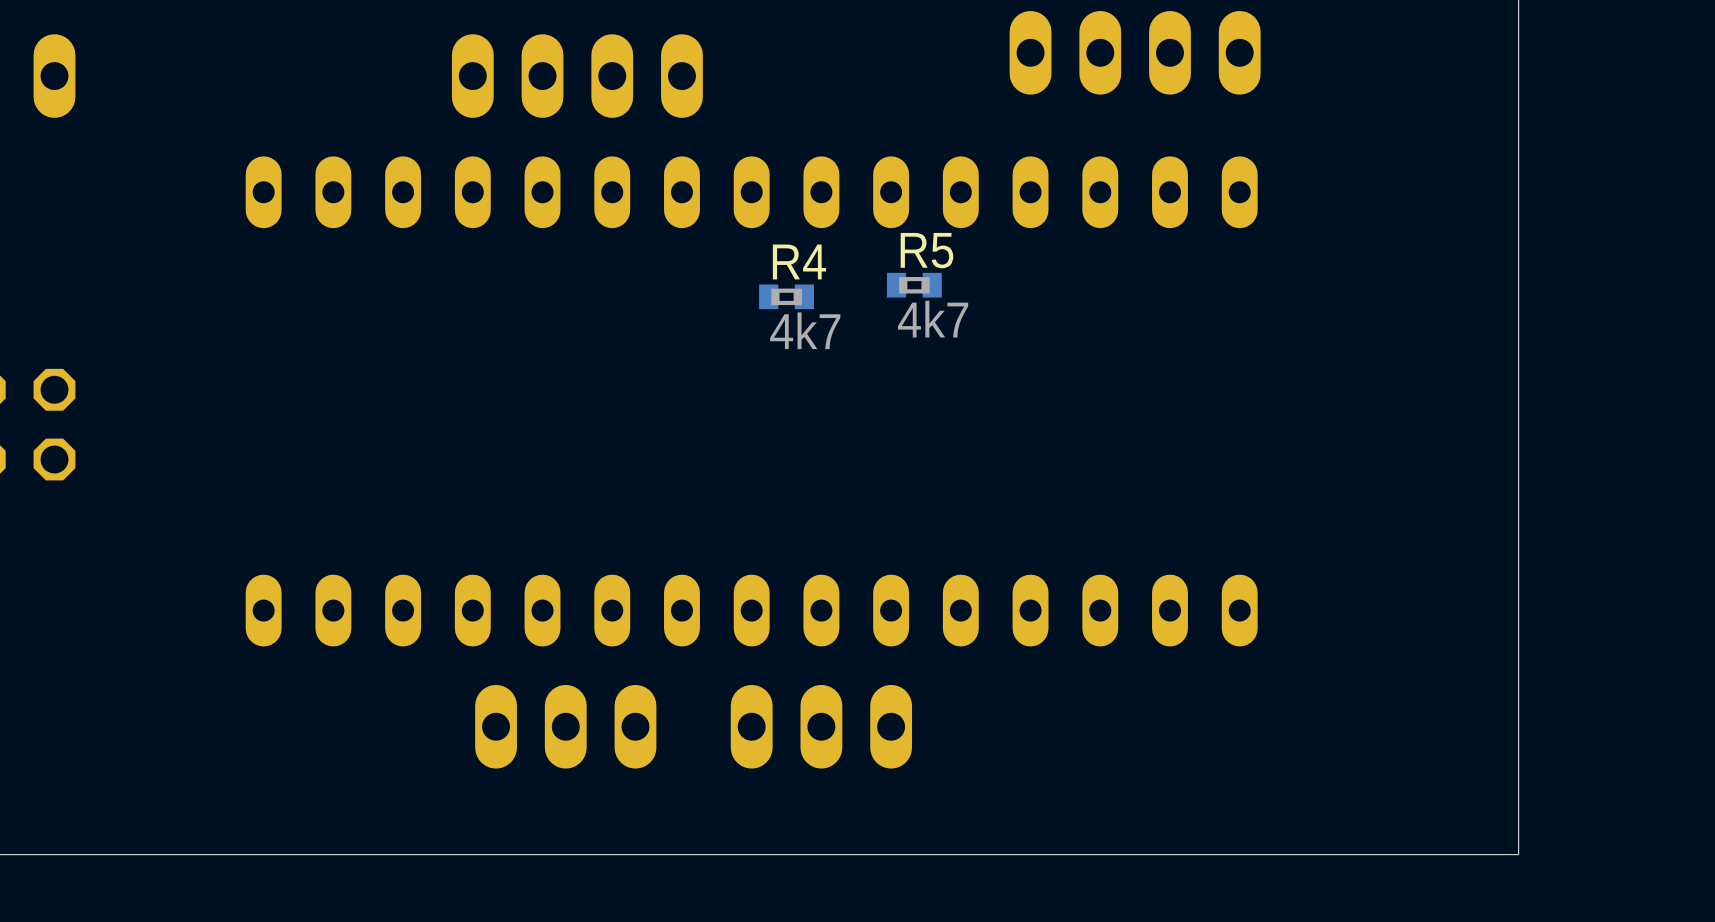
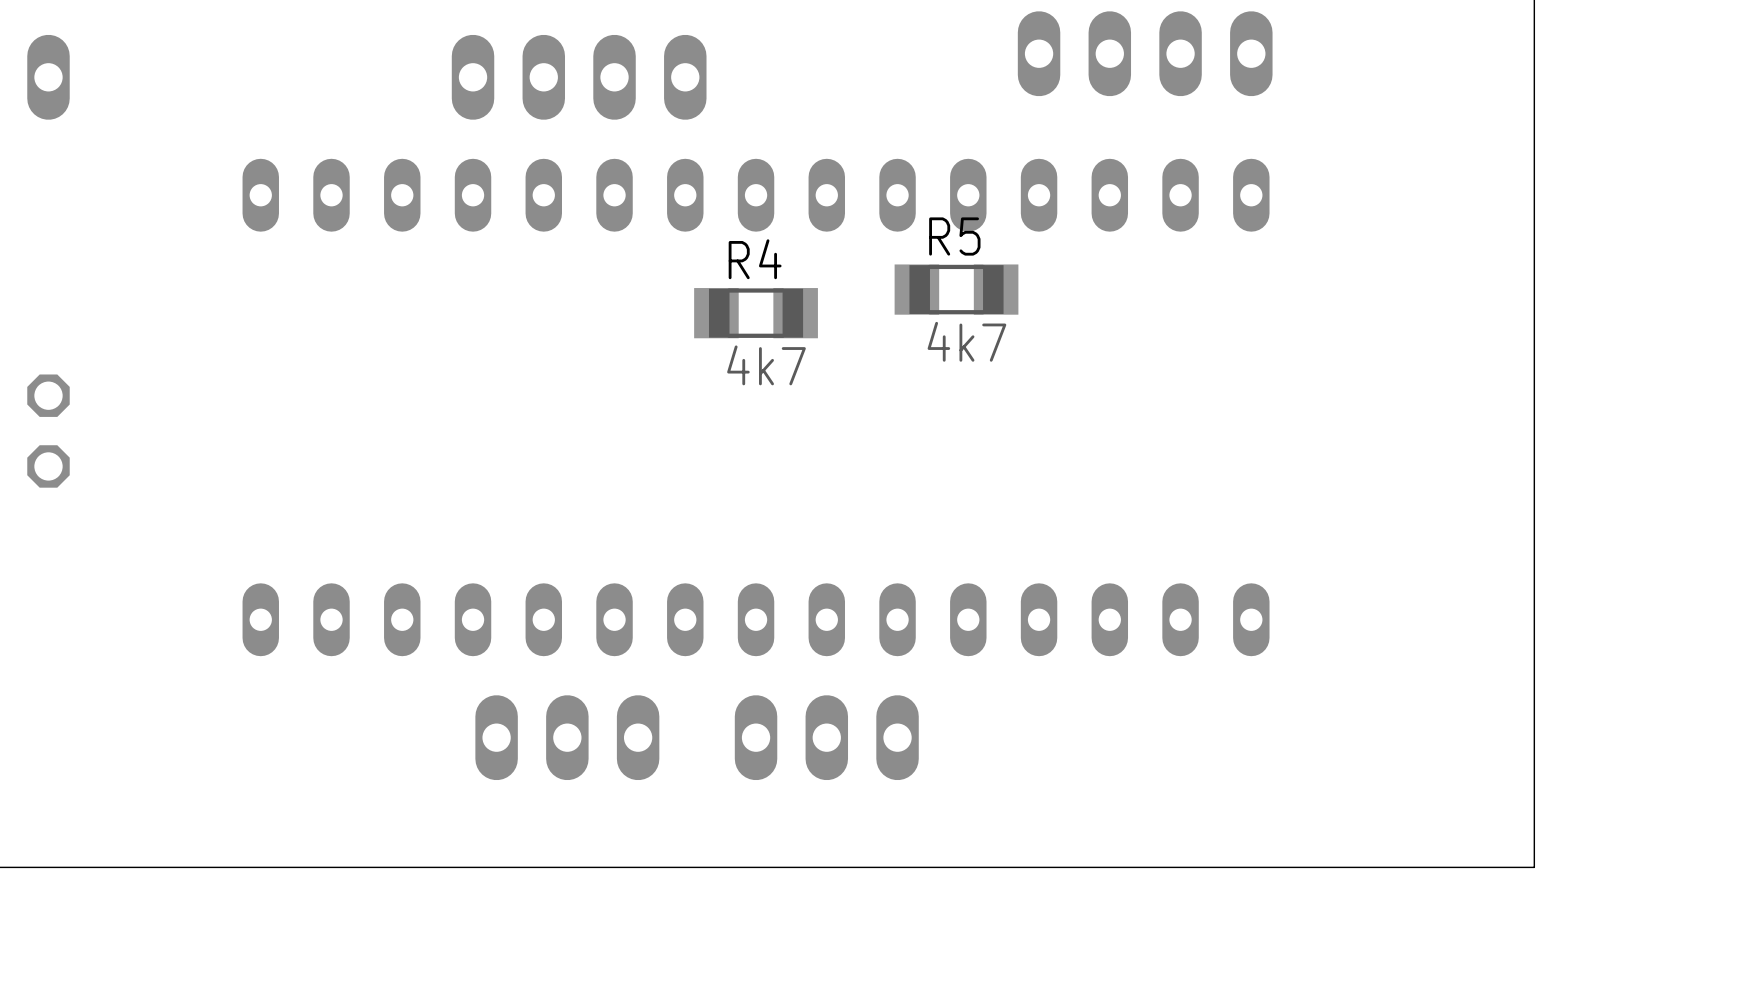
R5 footprint: [886, 272, 942, 298] -> [894, 264, 1019, 315]
R4 footprint: [759, 284, 814, 310] -> [694, 288, 818, 339]

